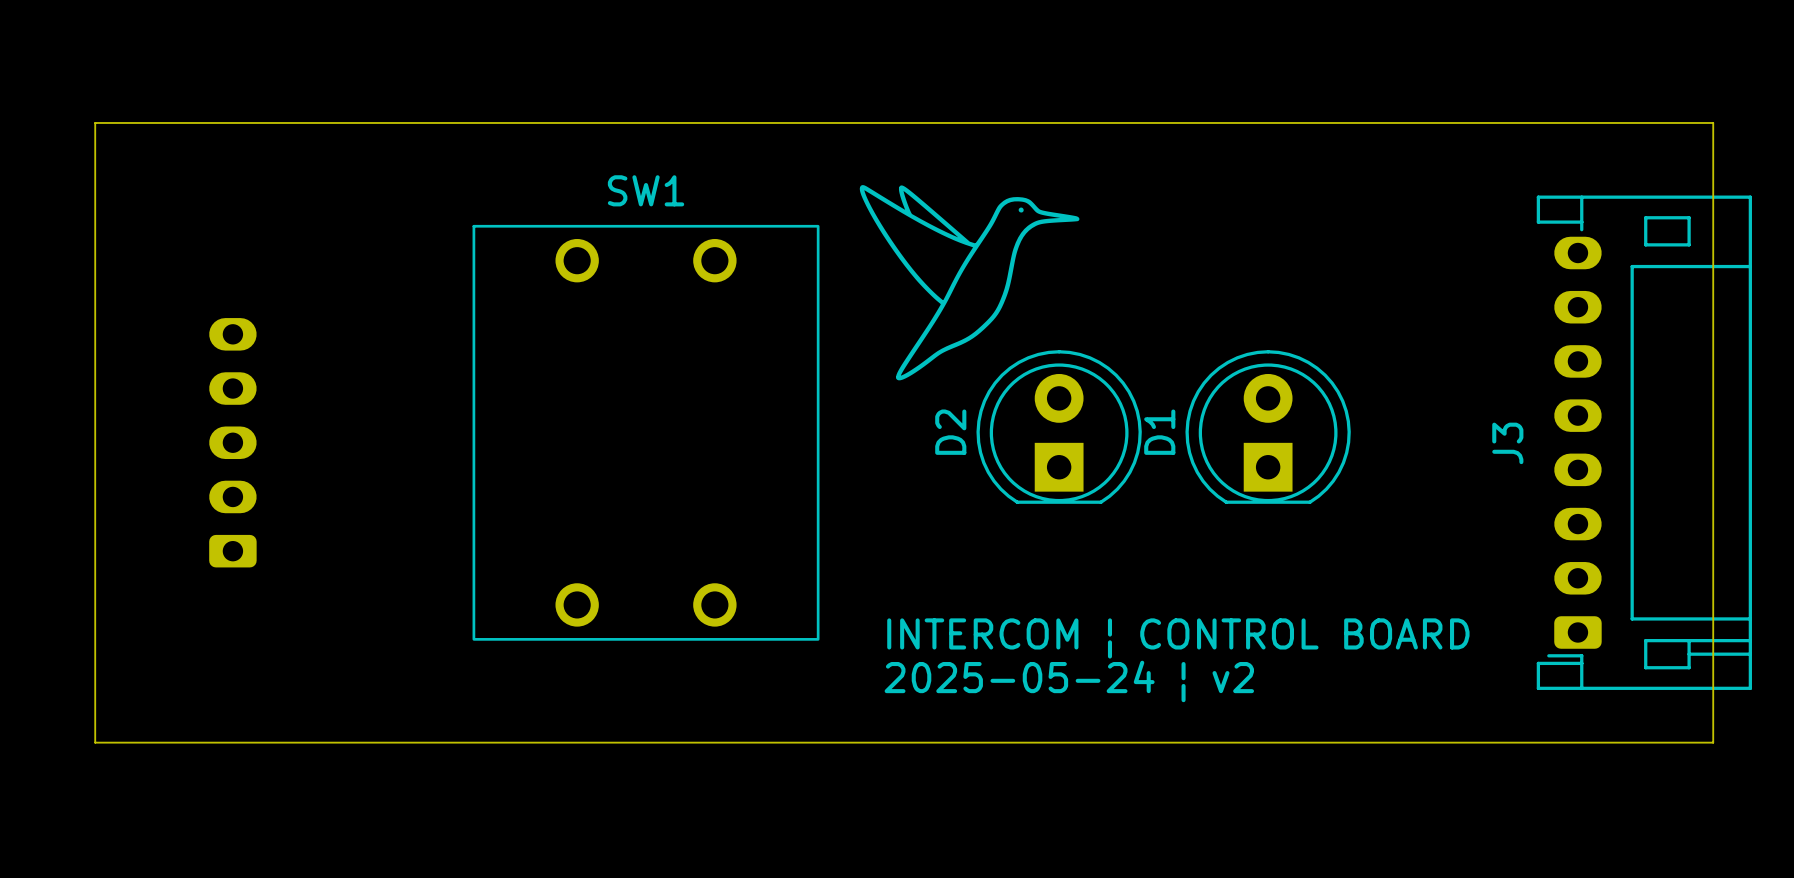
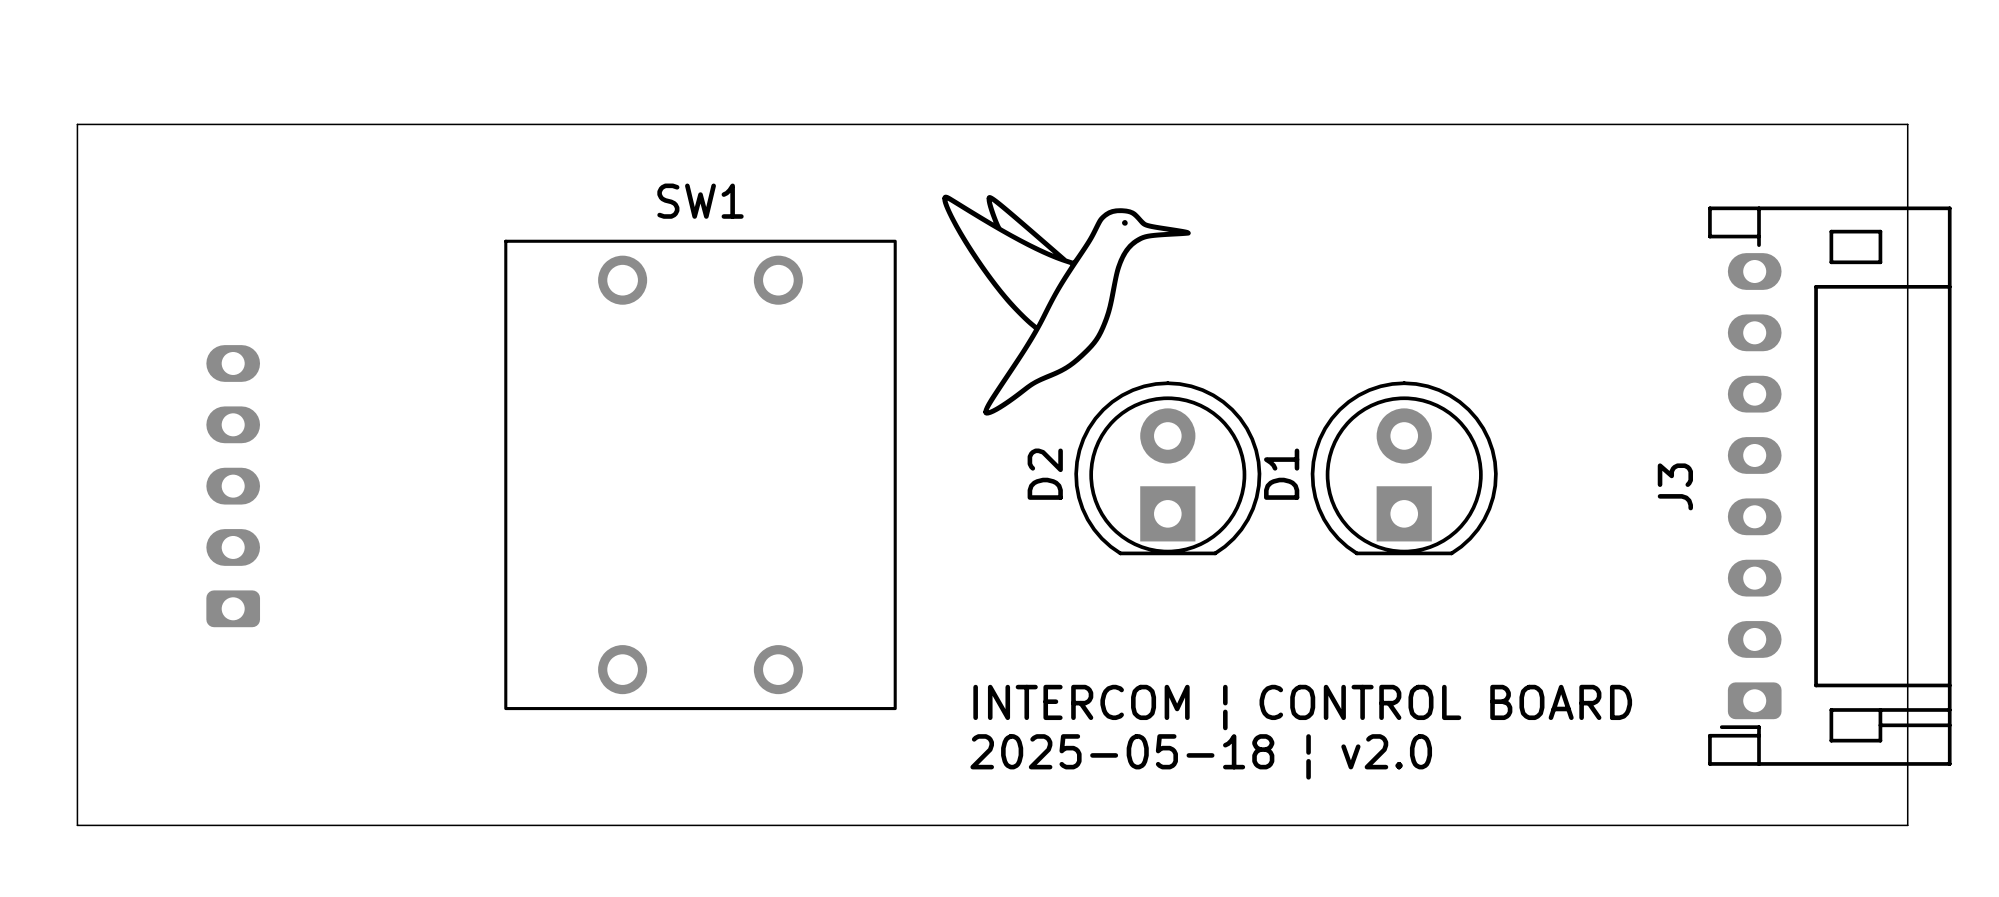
text: 2025-05-24 ¦ v2 (1069, 681) -> 2025-05-18 ¦ v2.0 (1201, 756)

